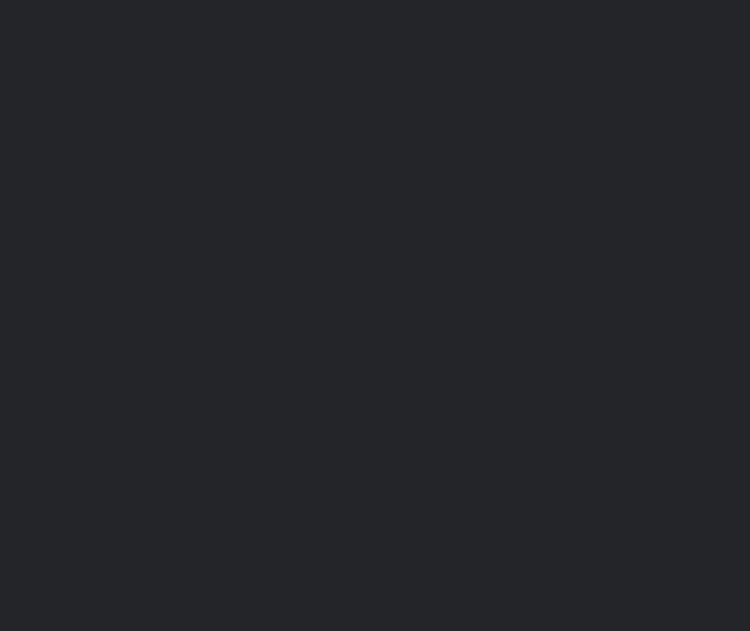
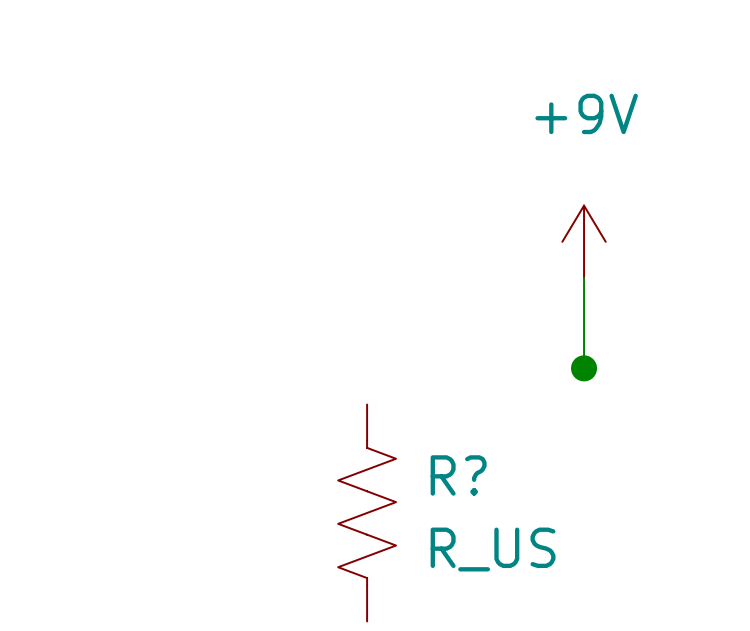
power symbol: none -> +9V (584, 241)
wire: none -> (584, 277) (584, 368)
junction: none -> (584, 368)
R?: none -> R_US (367, 512)

